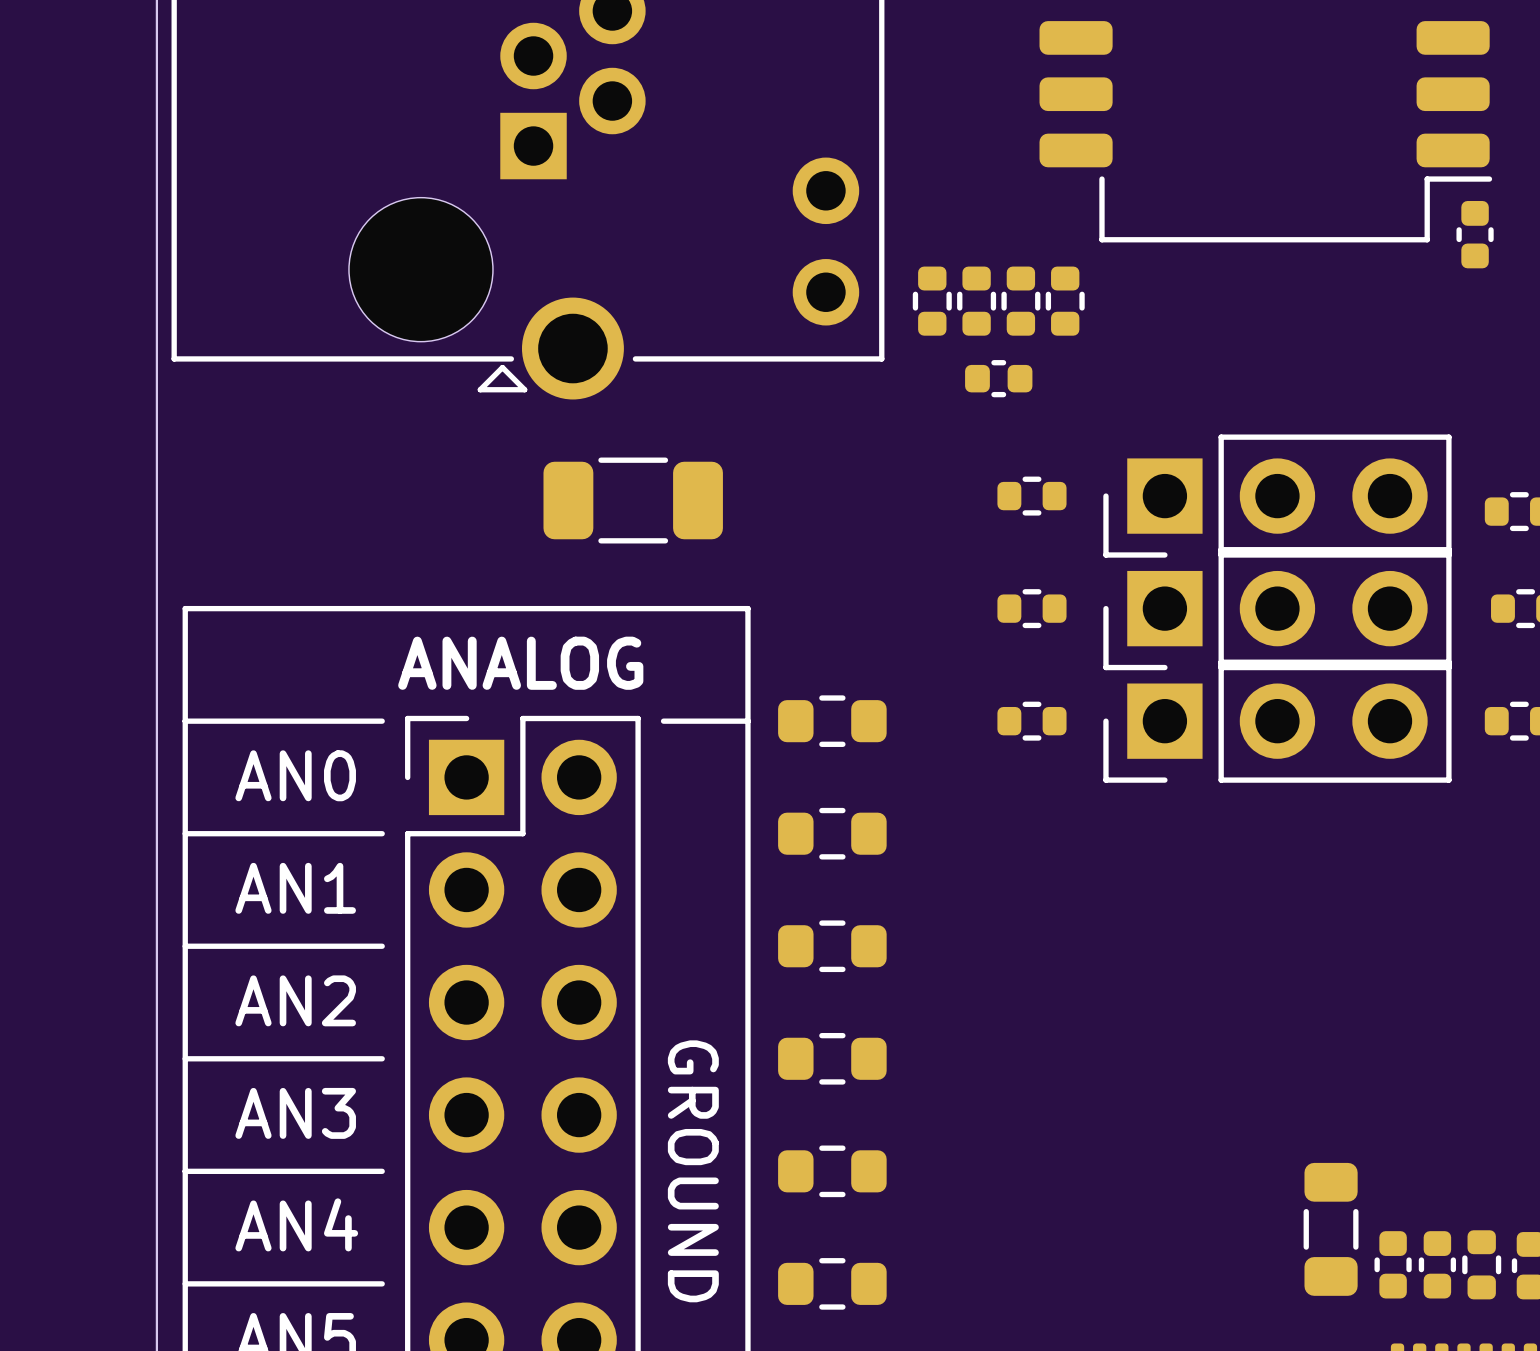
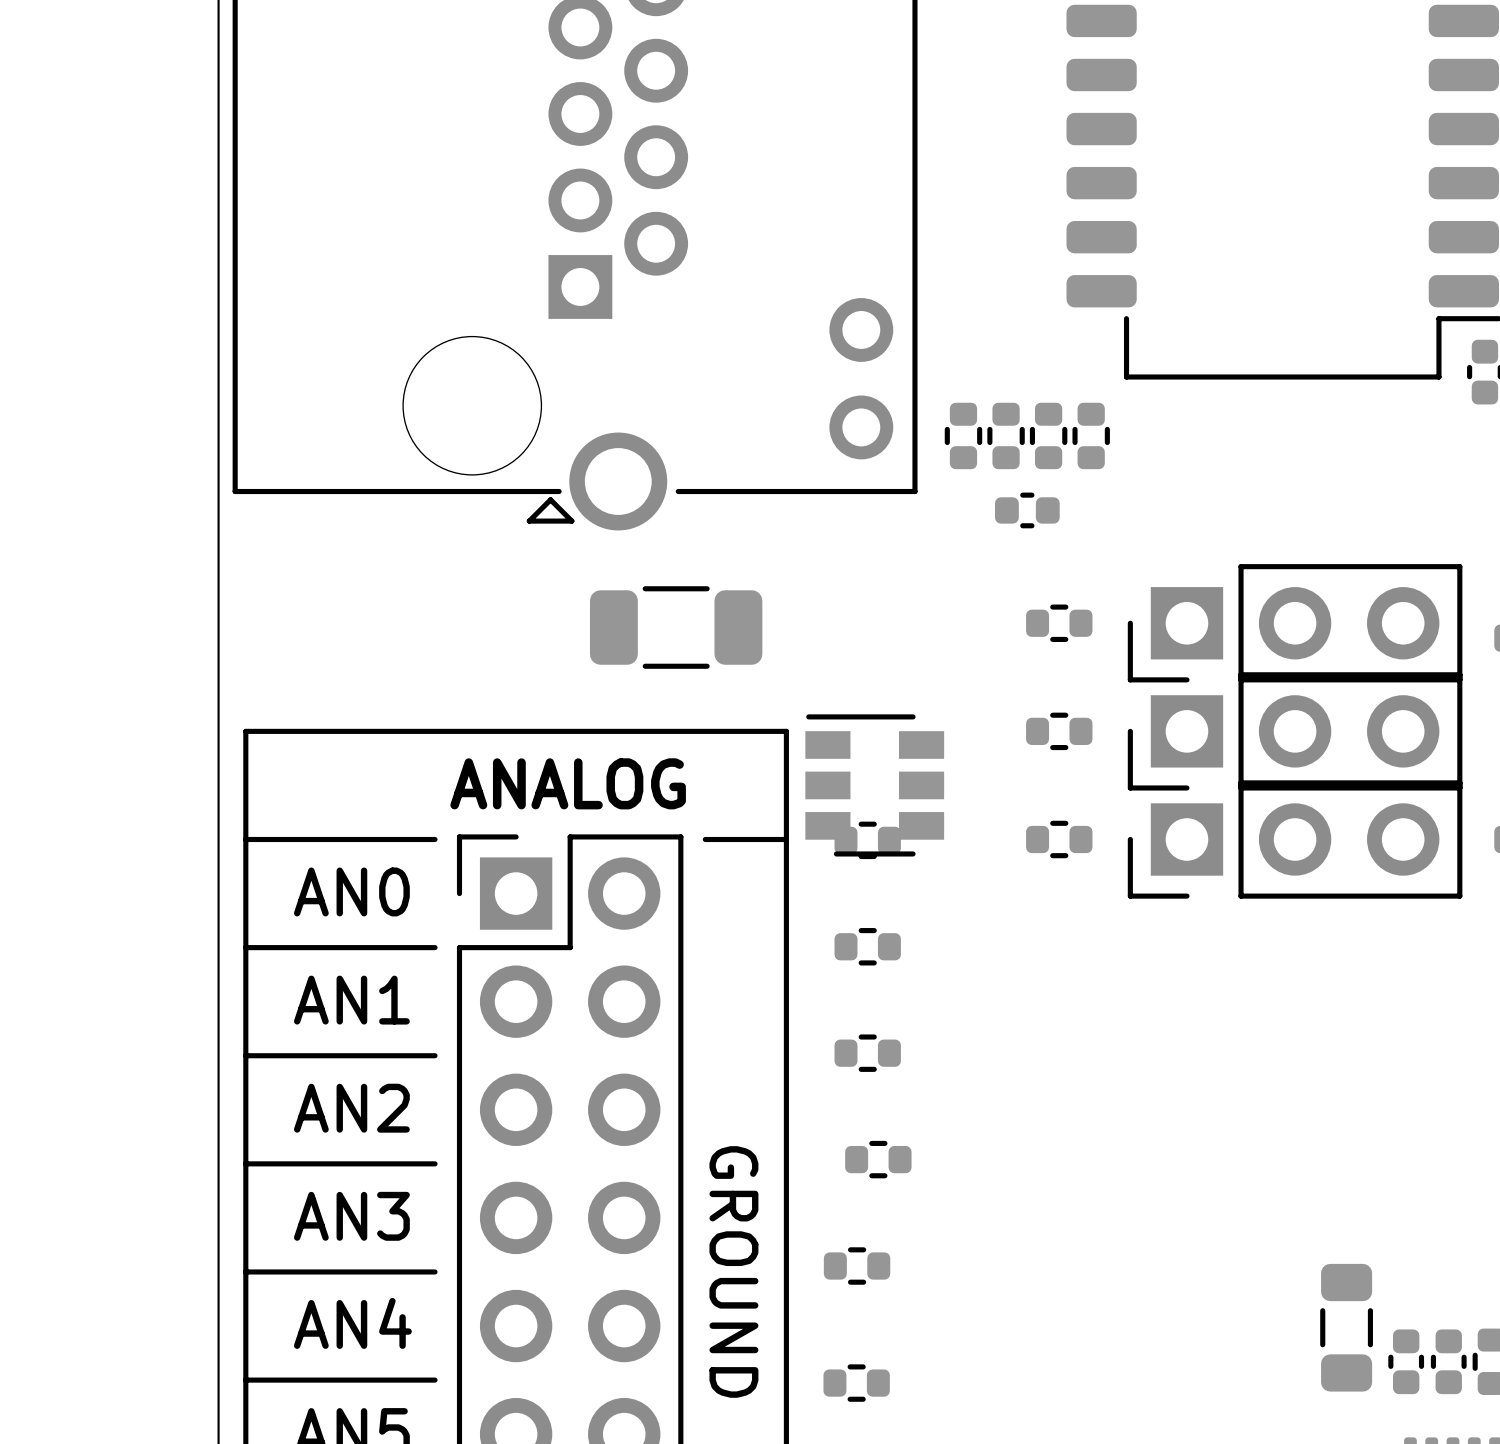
part: none -> (874, 785)
part footprint: [778, 695, 887, 747] -> [834, 821, 901, 860]
part footprint: [778, 807, 887, 860] -> [834, 928, 901, 966]
part footprint: [778, 920, 887, 973] -> [834, 1034, 901, 1072]
part footprint: [778, 1032, 887, 1085] -> [845, 1140, 912, 1179]
part footprint: [778, 1145, 887, 1198] -> [823, 1247, 891, 1285]
part footprint: [778, 1258, 887, 1310] -> [823, 1364, 890, 1402]

